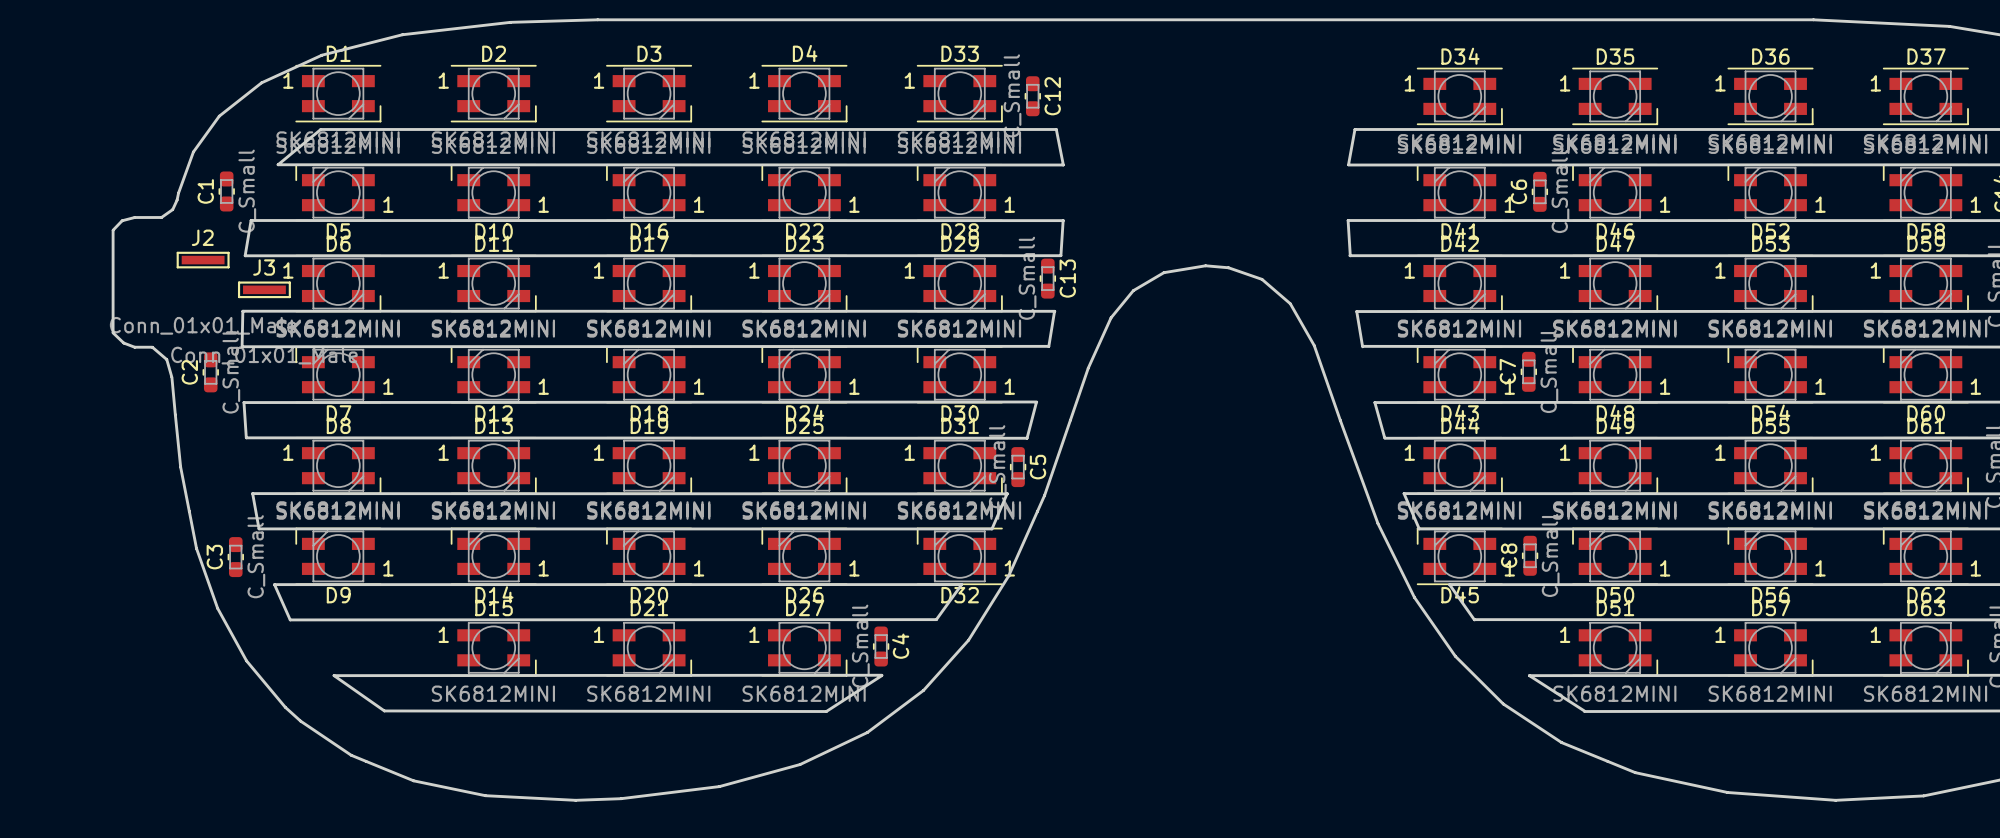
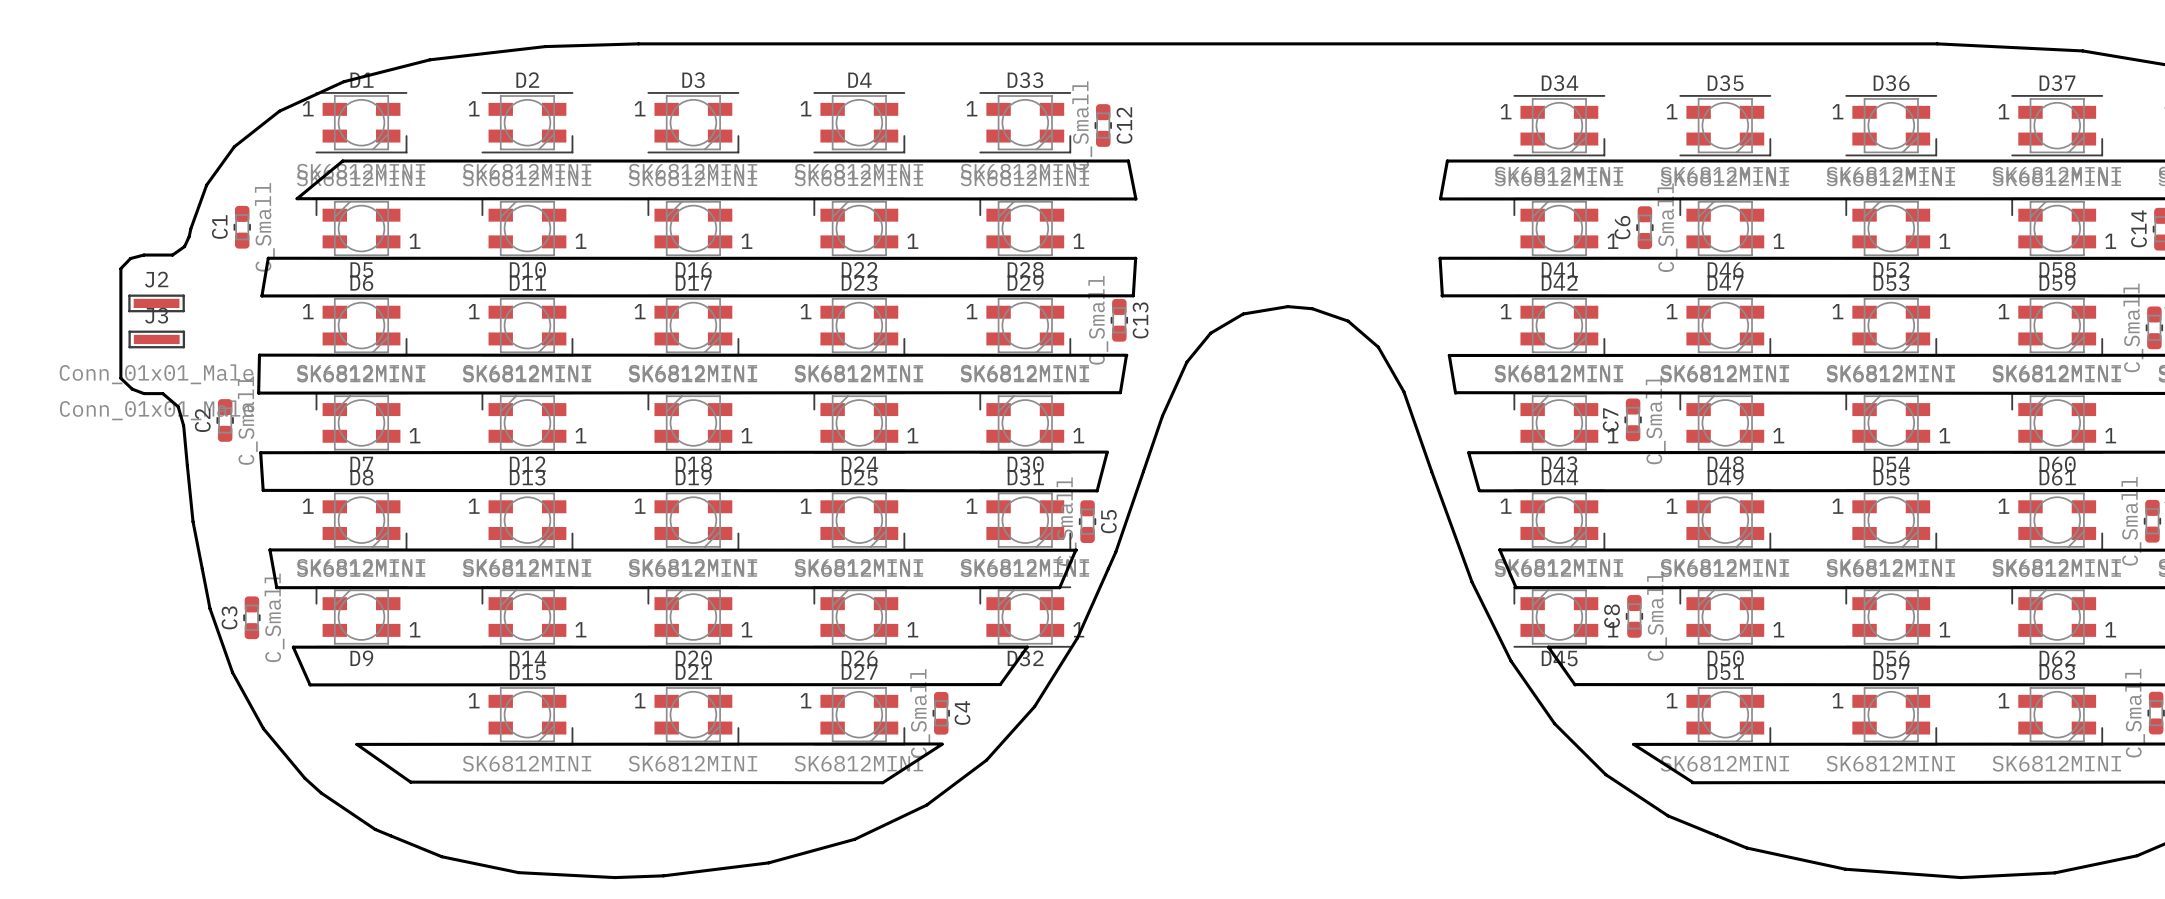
J2 position: (203, 260) -> (156, 303)
J3 position: (264, 289) -> (156, 339)

